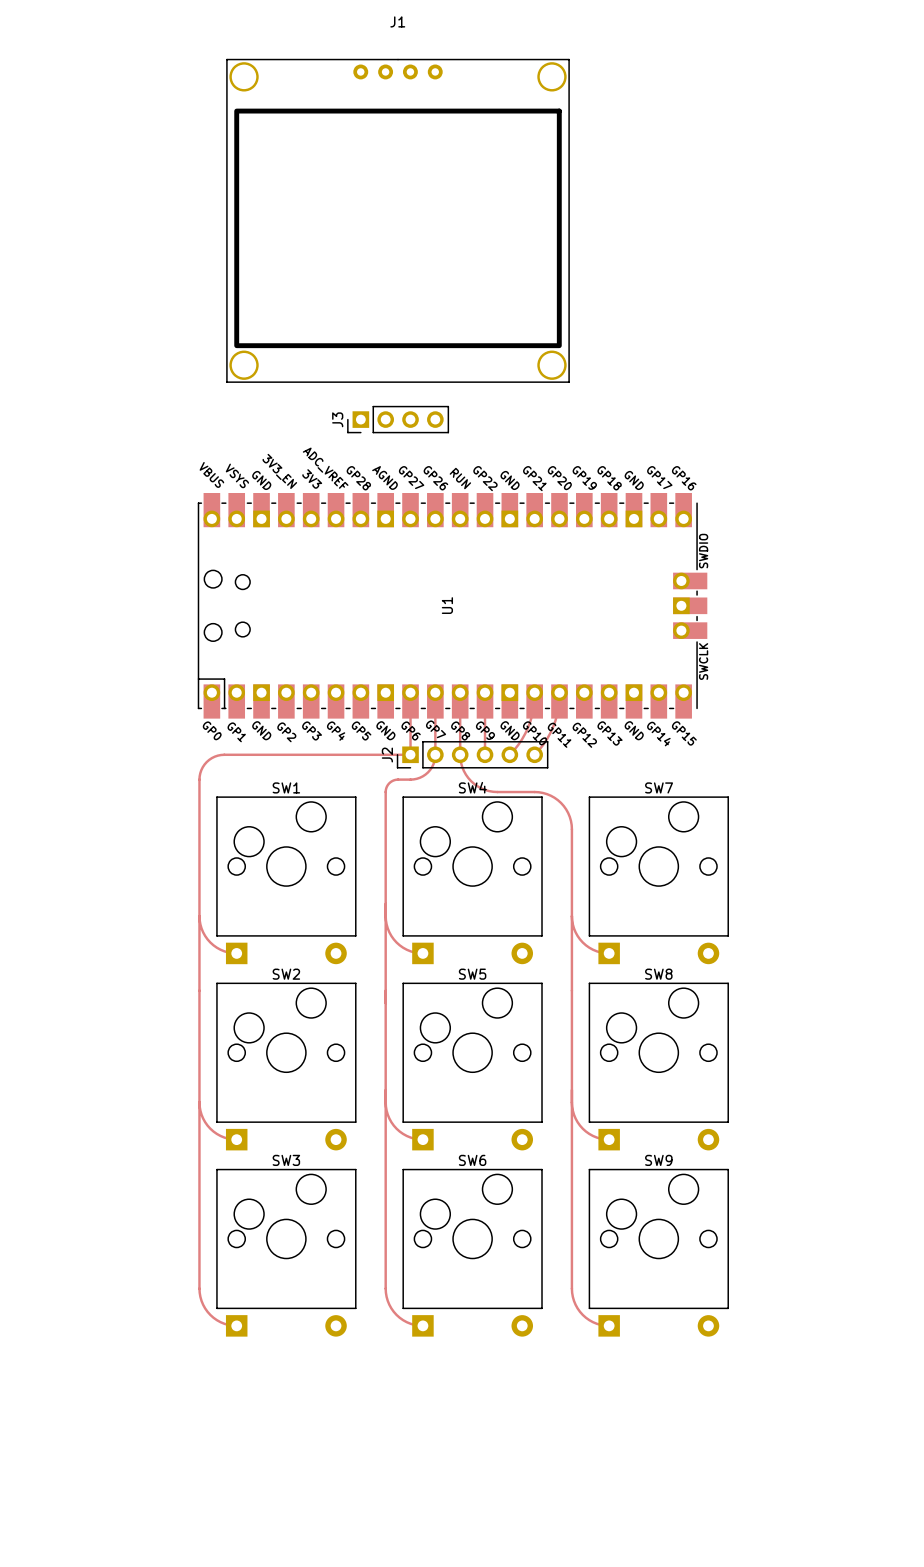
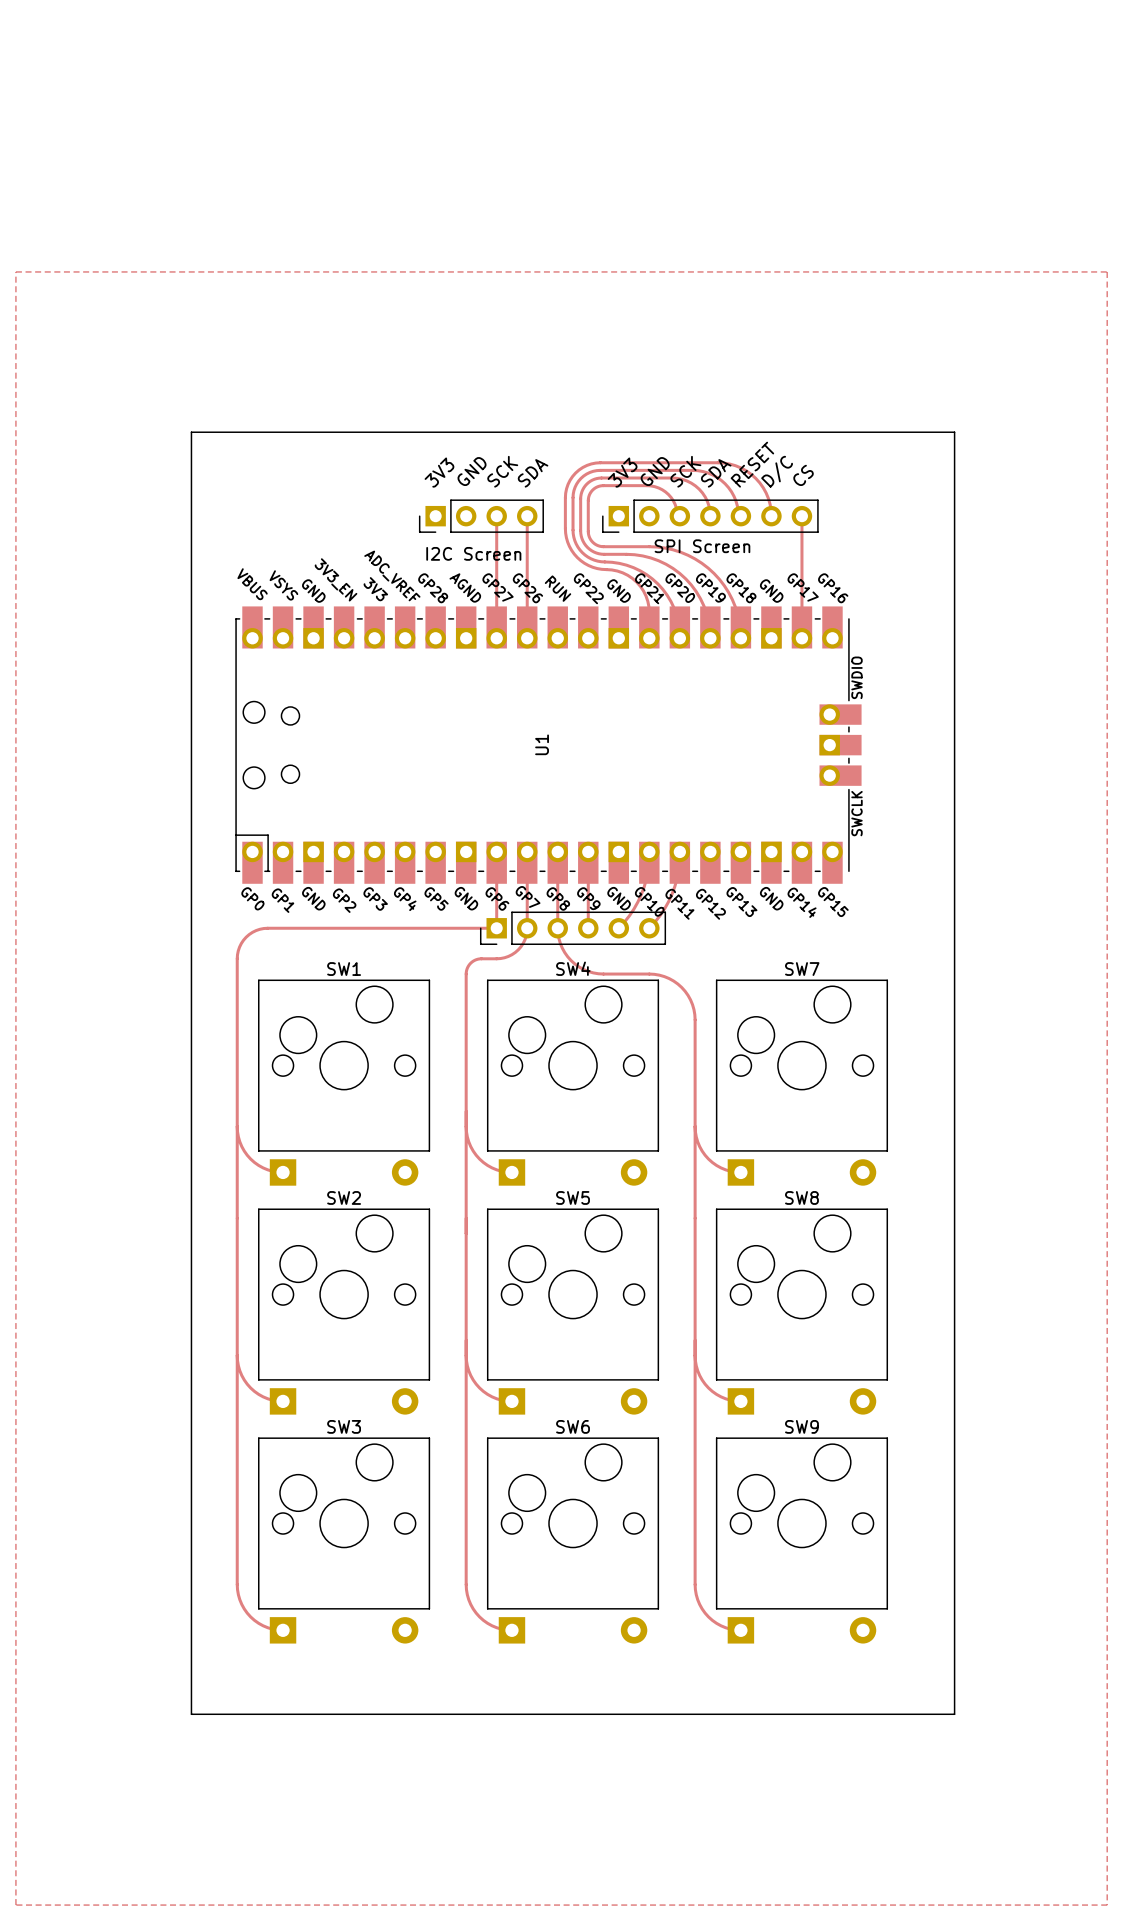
zone outline: none -> (15, 271) (15, 1905) (1107, 1905) (1107, 271) (15, 271)
J1: (398, 220) -> none
board edge: none -> (191, 432) (954, 432) (954, 1714) (191, 1714) (191, 432)
text: none -> RESET (752, 464)
text: none -> GND (472, 471)
text: none -> SCK (502, 471)
text: none -> GND (655, 471)
text: none -> SCK (685, 471)
text: none -> D/C (777, 471)
text: none -> 3V3 (439, 472)
text: none -> SDA (533, 473)
text: none -> 3V3 (622, 472)
text: none -> SDA (716, 473)
text: none -> CS (803, 475)
J3 name: J3 (337, 419) -> none
track: none -> (496, 516) (496, 638)
track: none -> (527, 516) (527, 638)
track: none -> (679, 516) (677, 516) (675, 504) (671, 497) (662, 489) (654, 486) (601, 485) (594, 488) (588, 496) (588, 533) (592, 542) (601, 546) (665, 548) (688, 555) (701, 563) (719, 579) (732, 599) (739, 622) (740, 638)
track: none -> (710, 516) (707, 501) (699, 489) (686, 480) (677, 478) (596, 478) (586, 484) (580, 496) (580, 533) (587, 547) (601, 554) (642, 555) (658, 560) (673, 568) (685, 578) (700, 598) (708, 621) (710, 638)
part: none -> SPI Screen (710, 516)
track: none -> (740, 516) (738, 516) (735, 501) (728, 487) (717, 477) (702, 471) (596, 470) (586, 474) (576, 484) (573, 494) (573, 530) (577, 547) (591, 558) (626, 565) (652, 578) (667, 595) (674, 608) (678, 622) (679, 638)
track: none -> (771, 516) (768, 498) (759, 482) (746, 470) (729, 464) (600, 462) (587, 465) (575, 473) (568, 484) (565, 493) (565, 533) (569, 546) (577, 557) (584, 563) (597, 568) (622, 572) (640, 586) (648, 606) (649, 638)
track: none -> (801, 516) (801, 638)
J3 value: none -> I2C Screen (473, 553)
J2 name: J2 (387, 755) -> none

